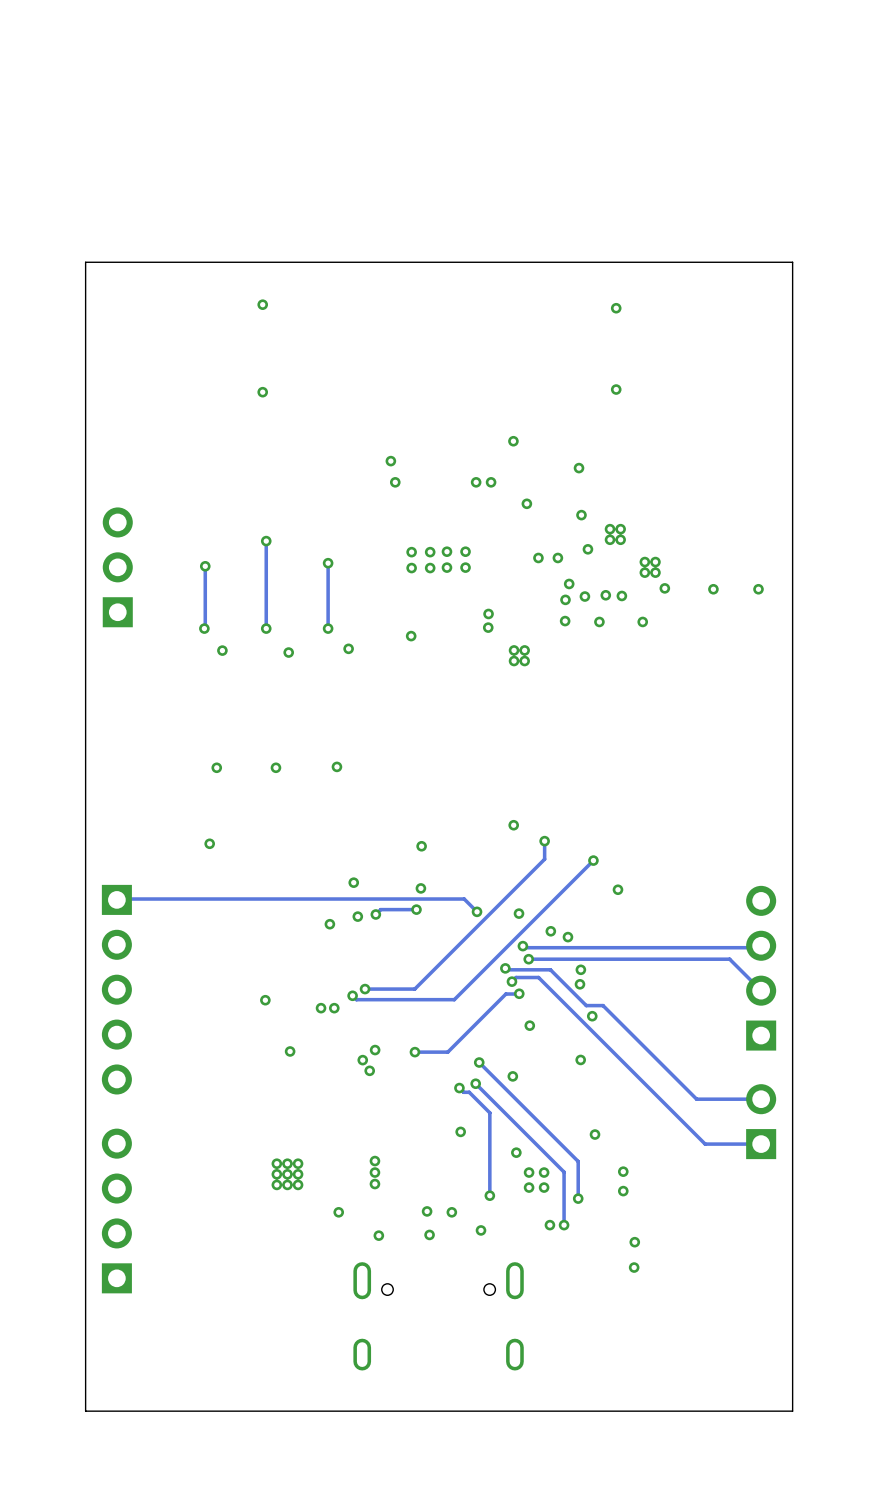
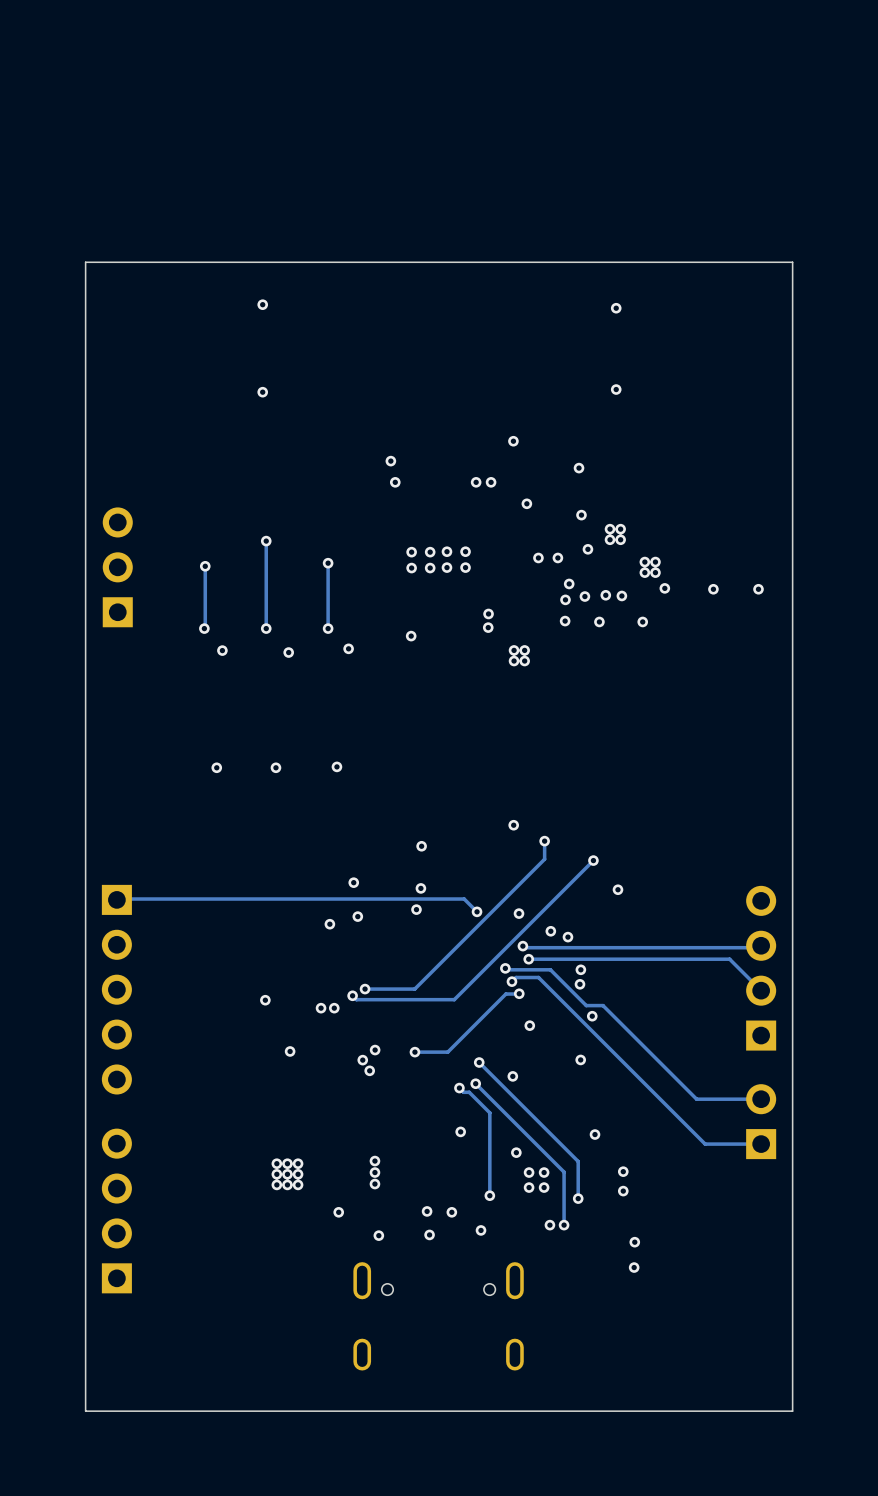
via: (209, 843) -> none
track: (416, 909) (380, 909) (375, 914) -> none
via: (375, 914) -> none

